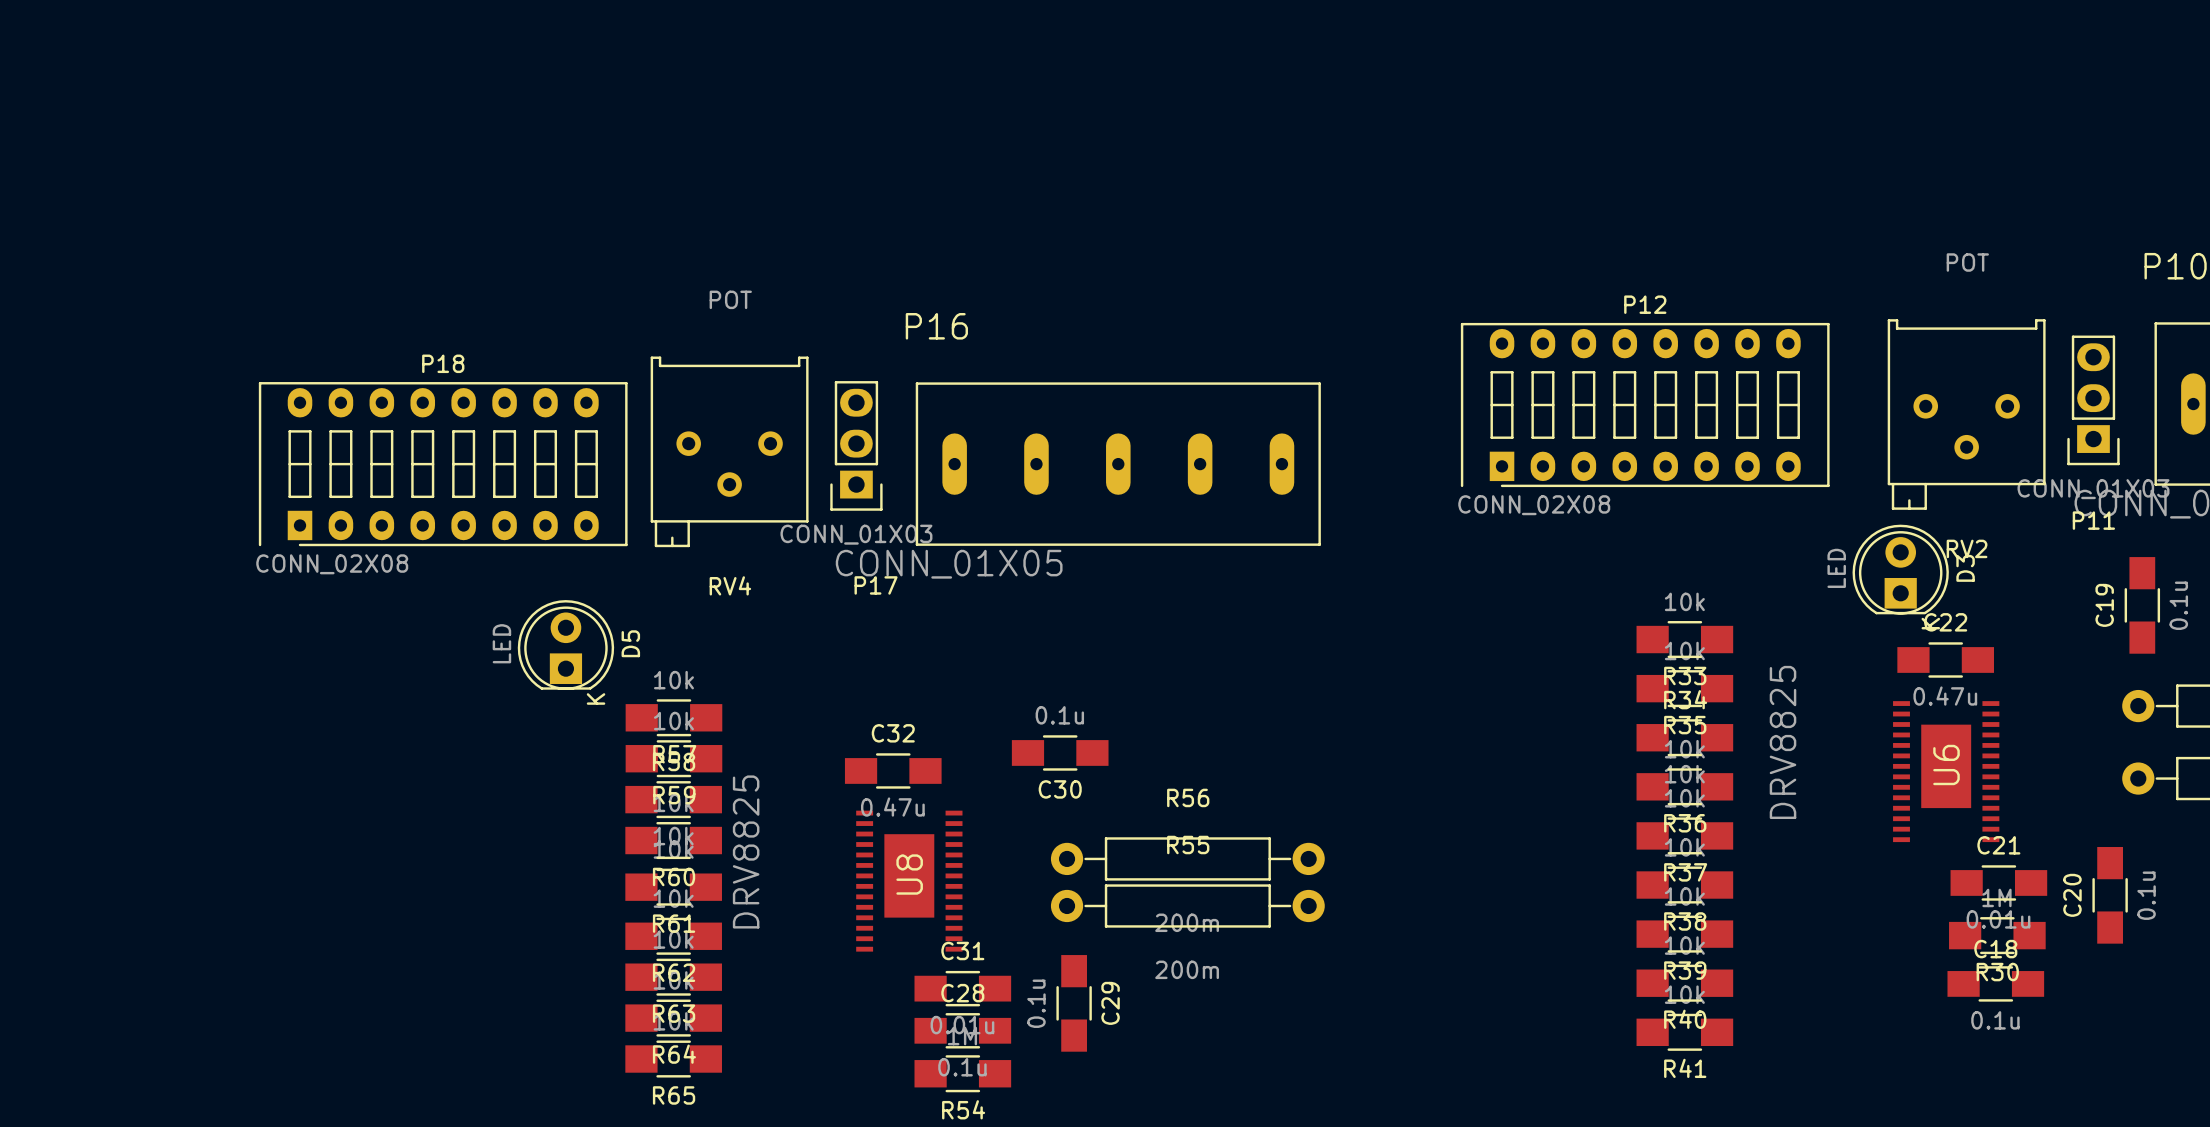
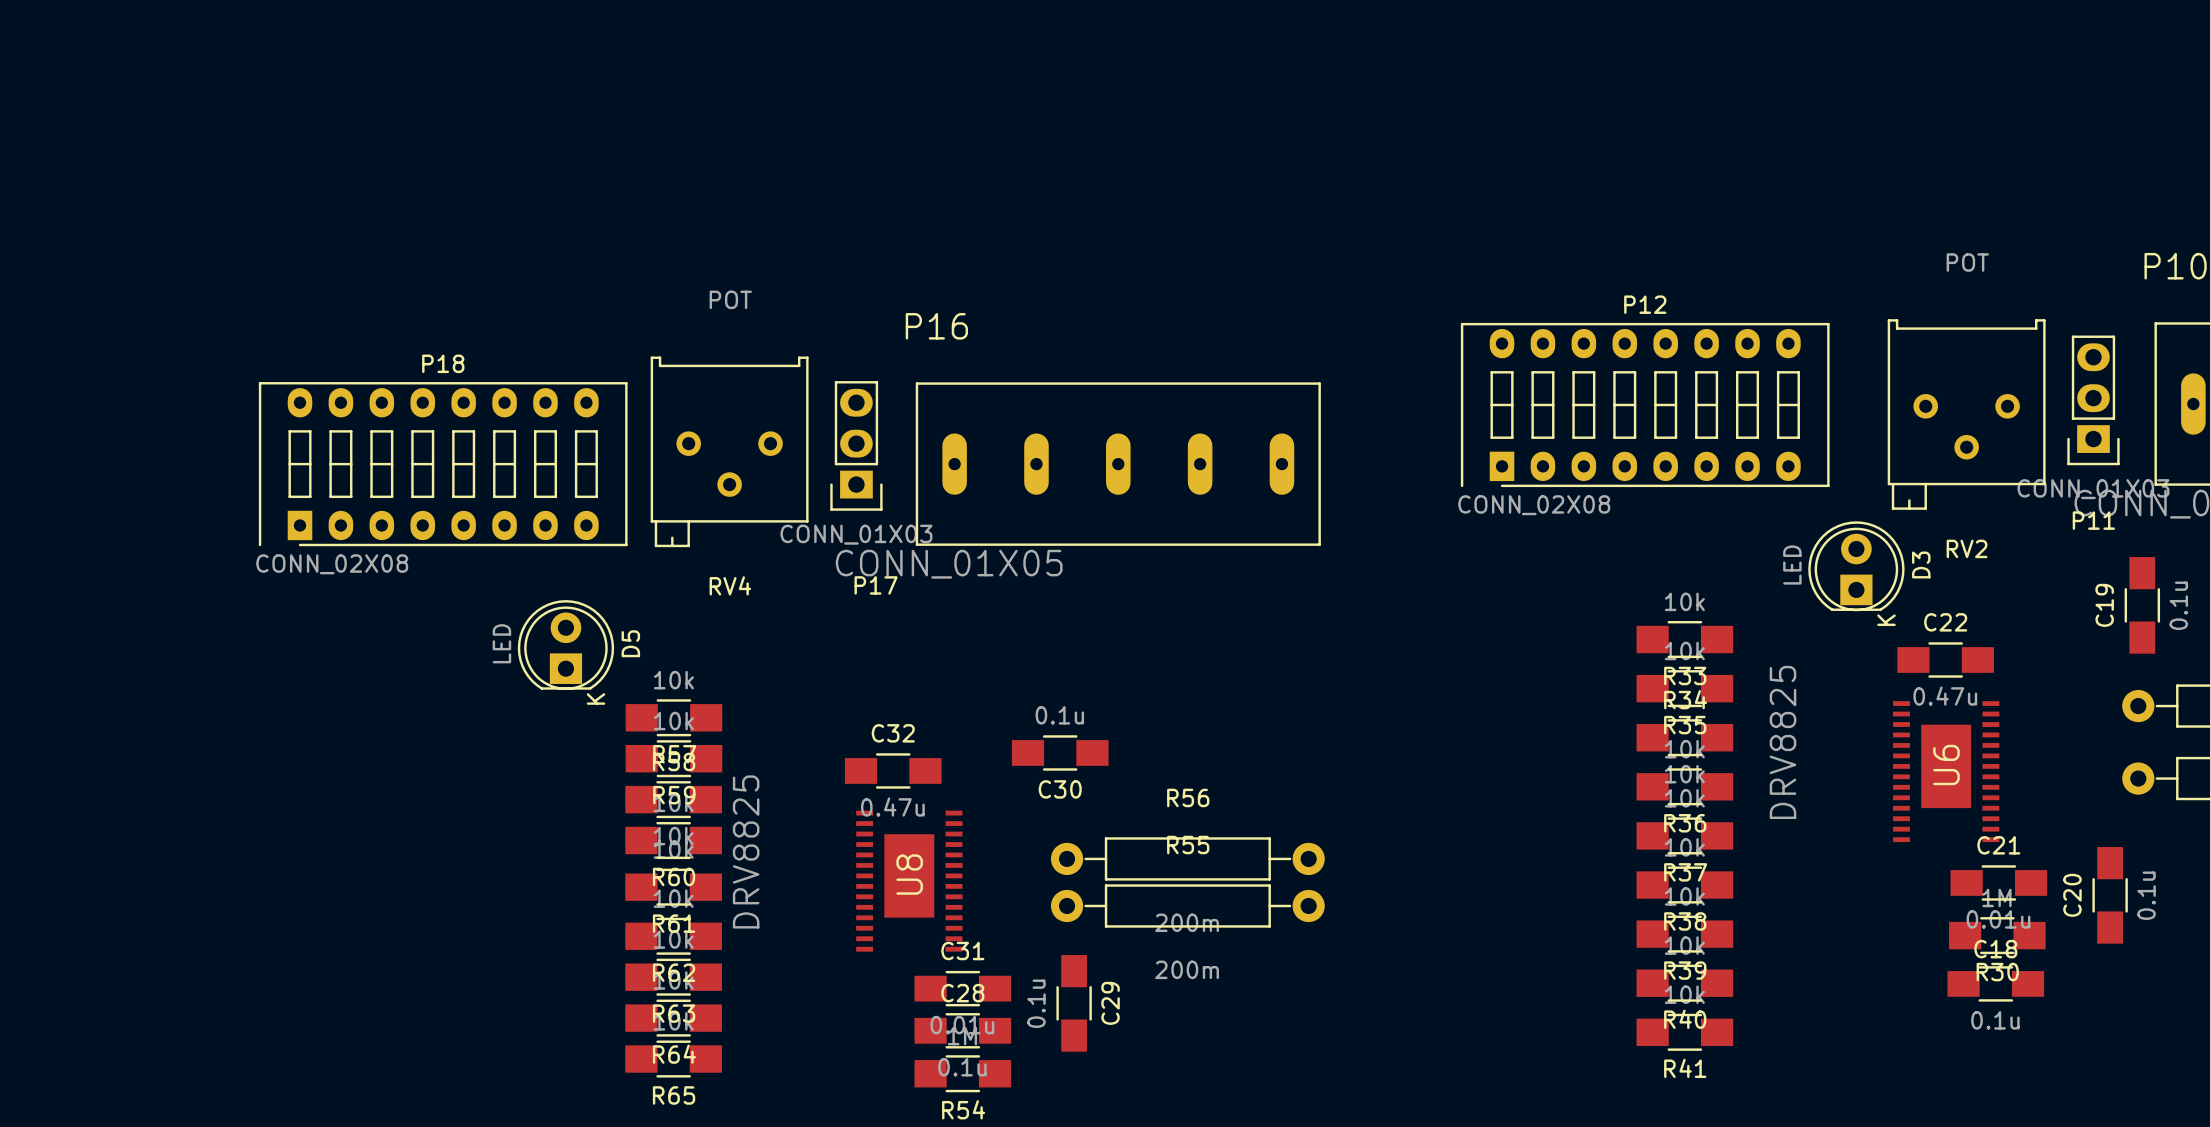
D3 position: (1900, 569) -> (1856, 566)

